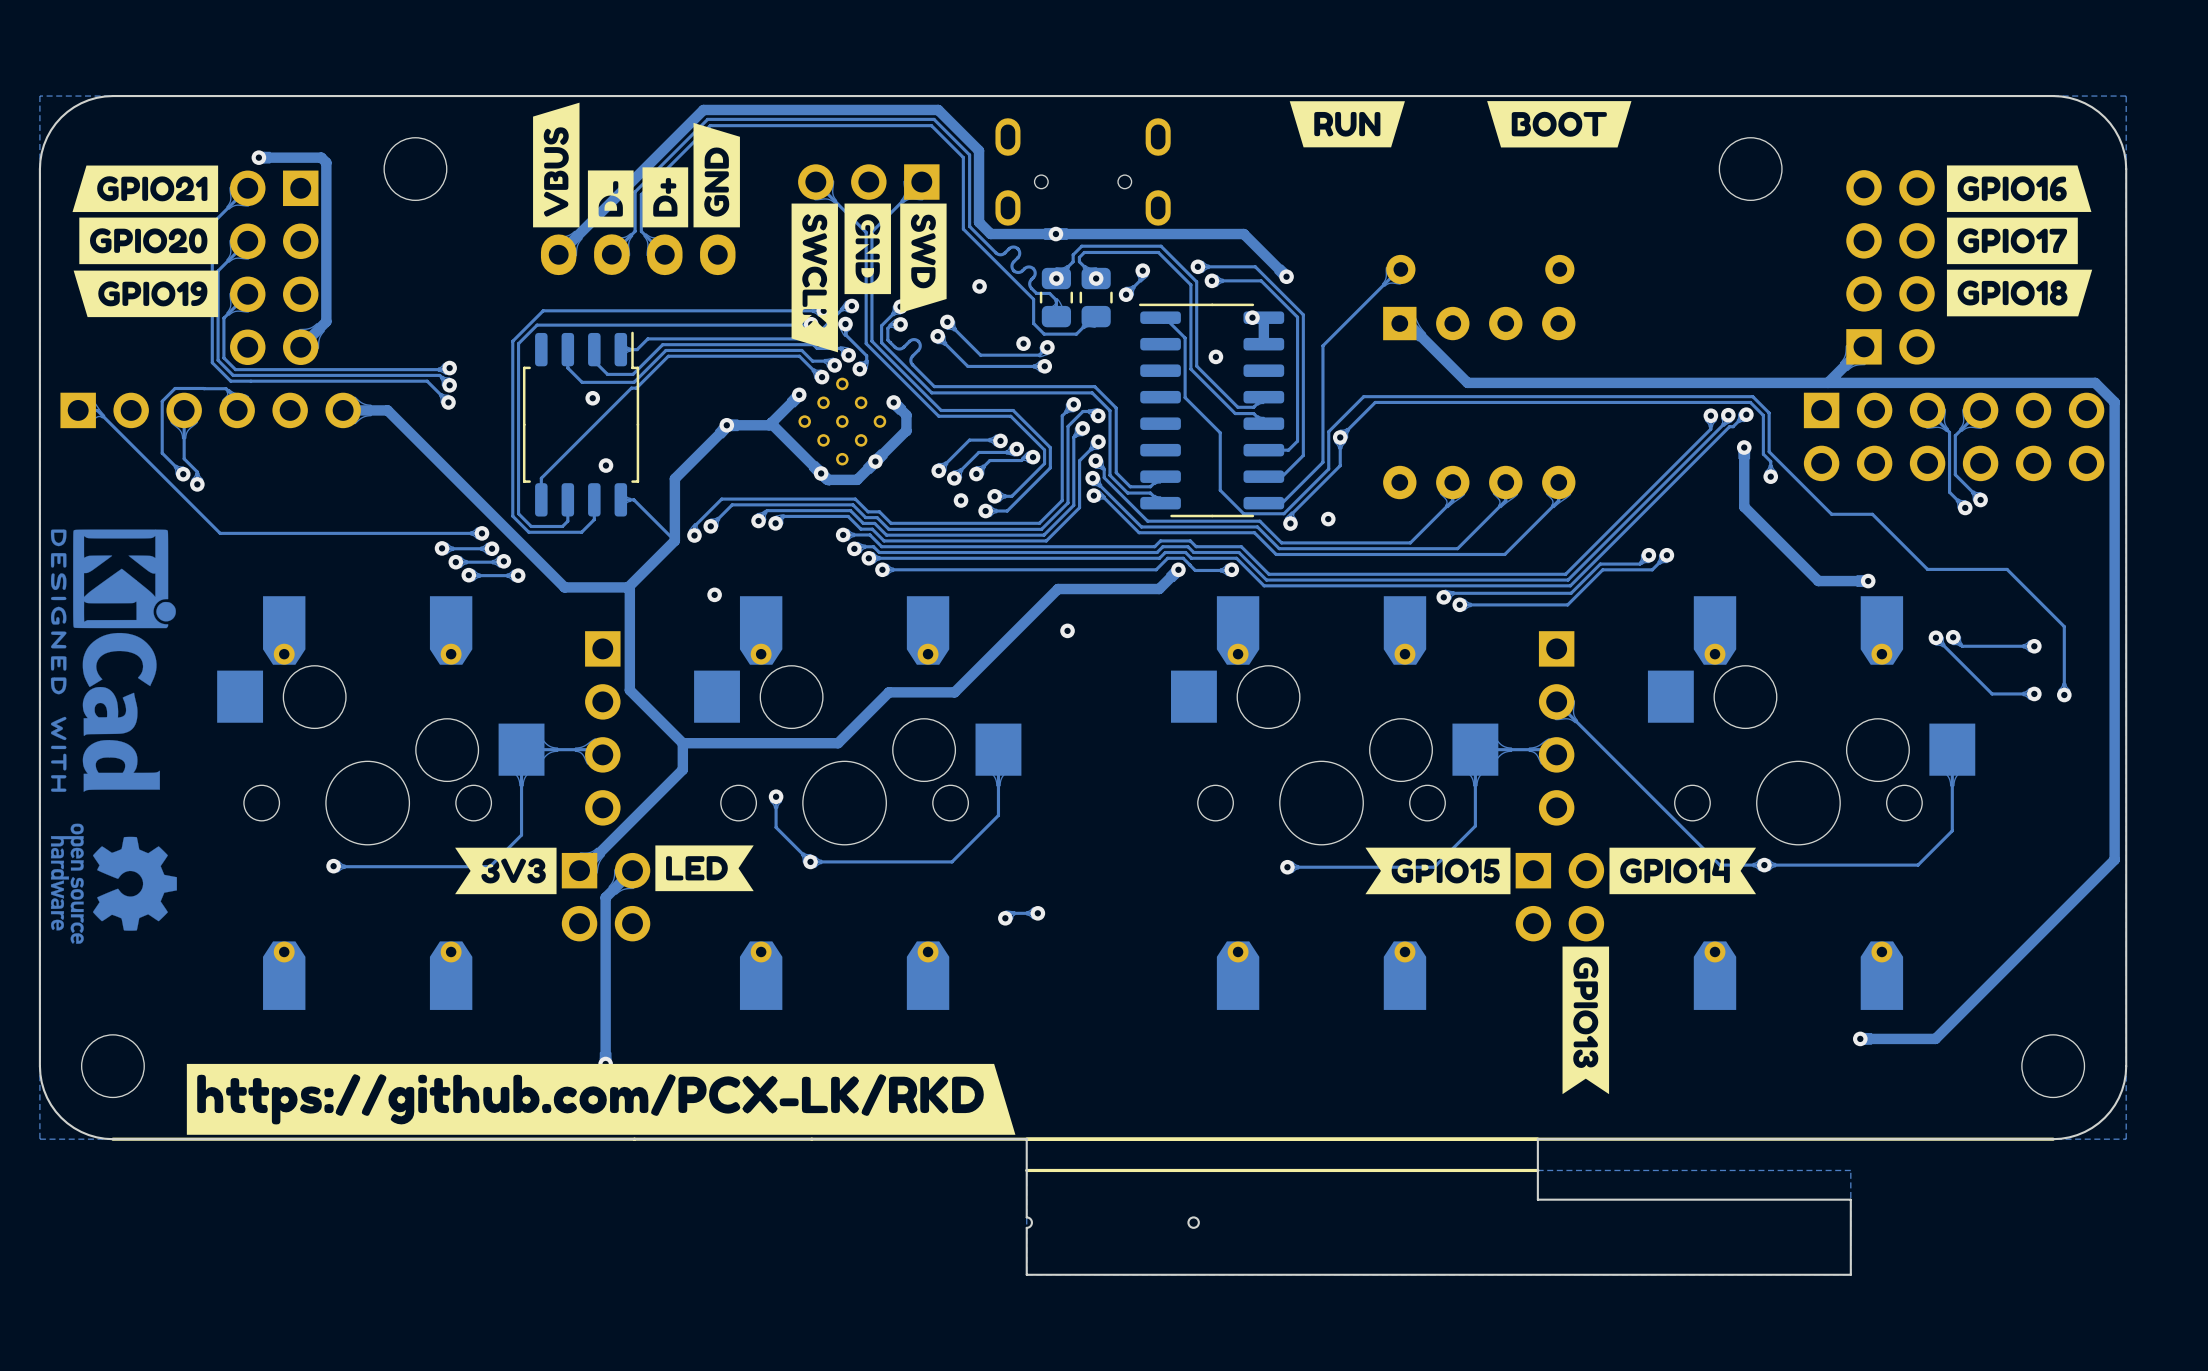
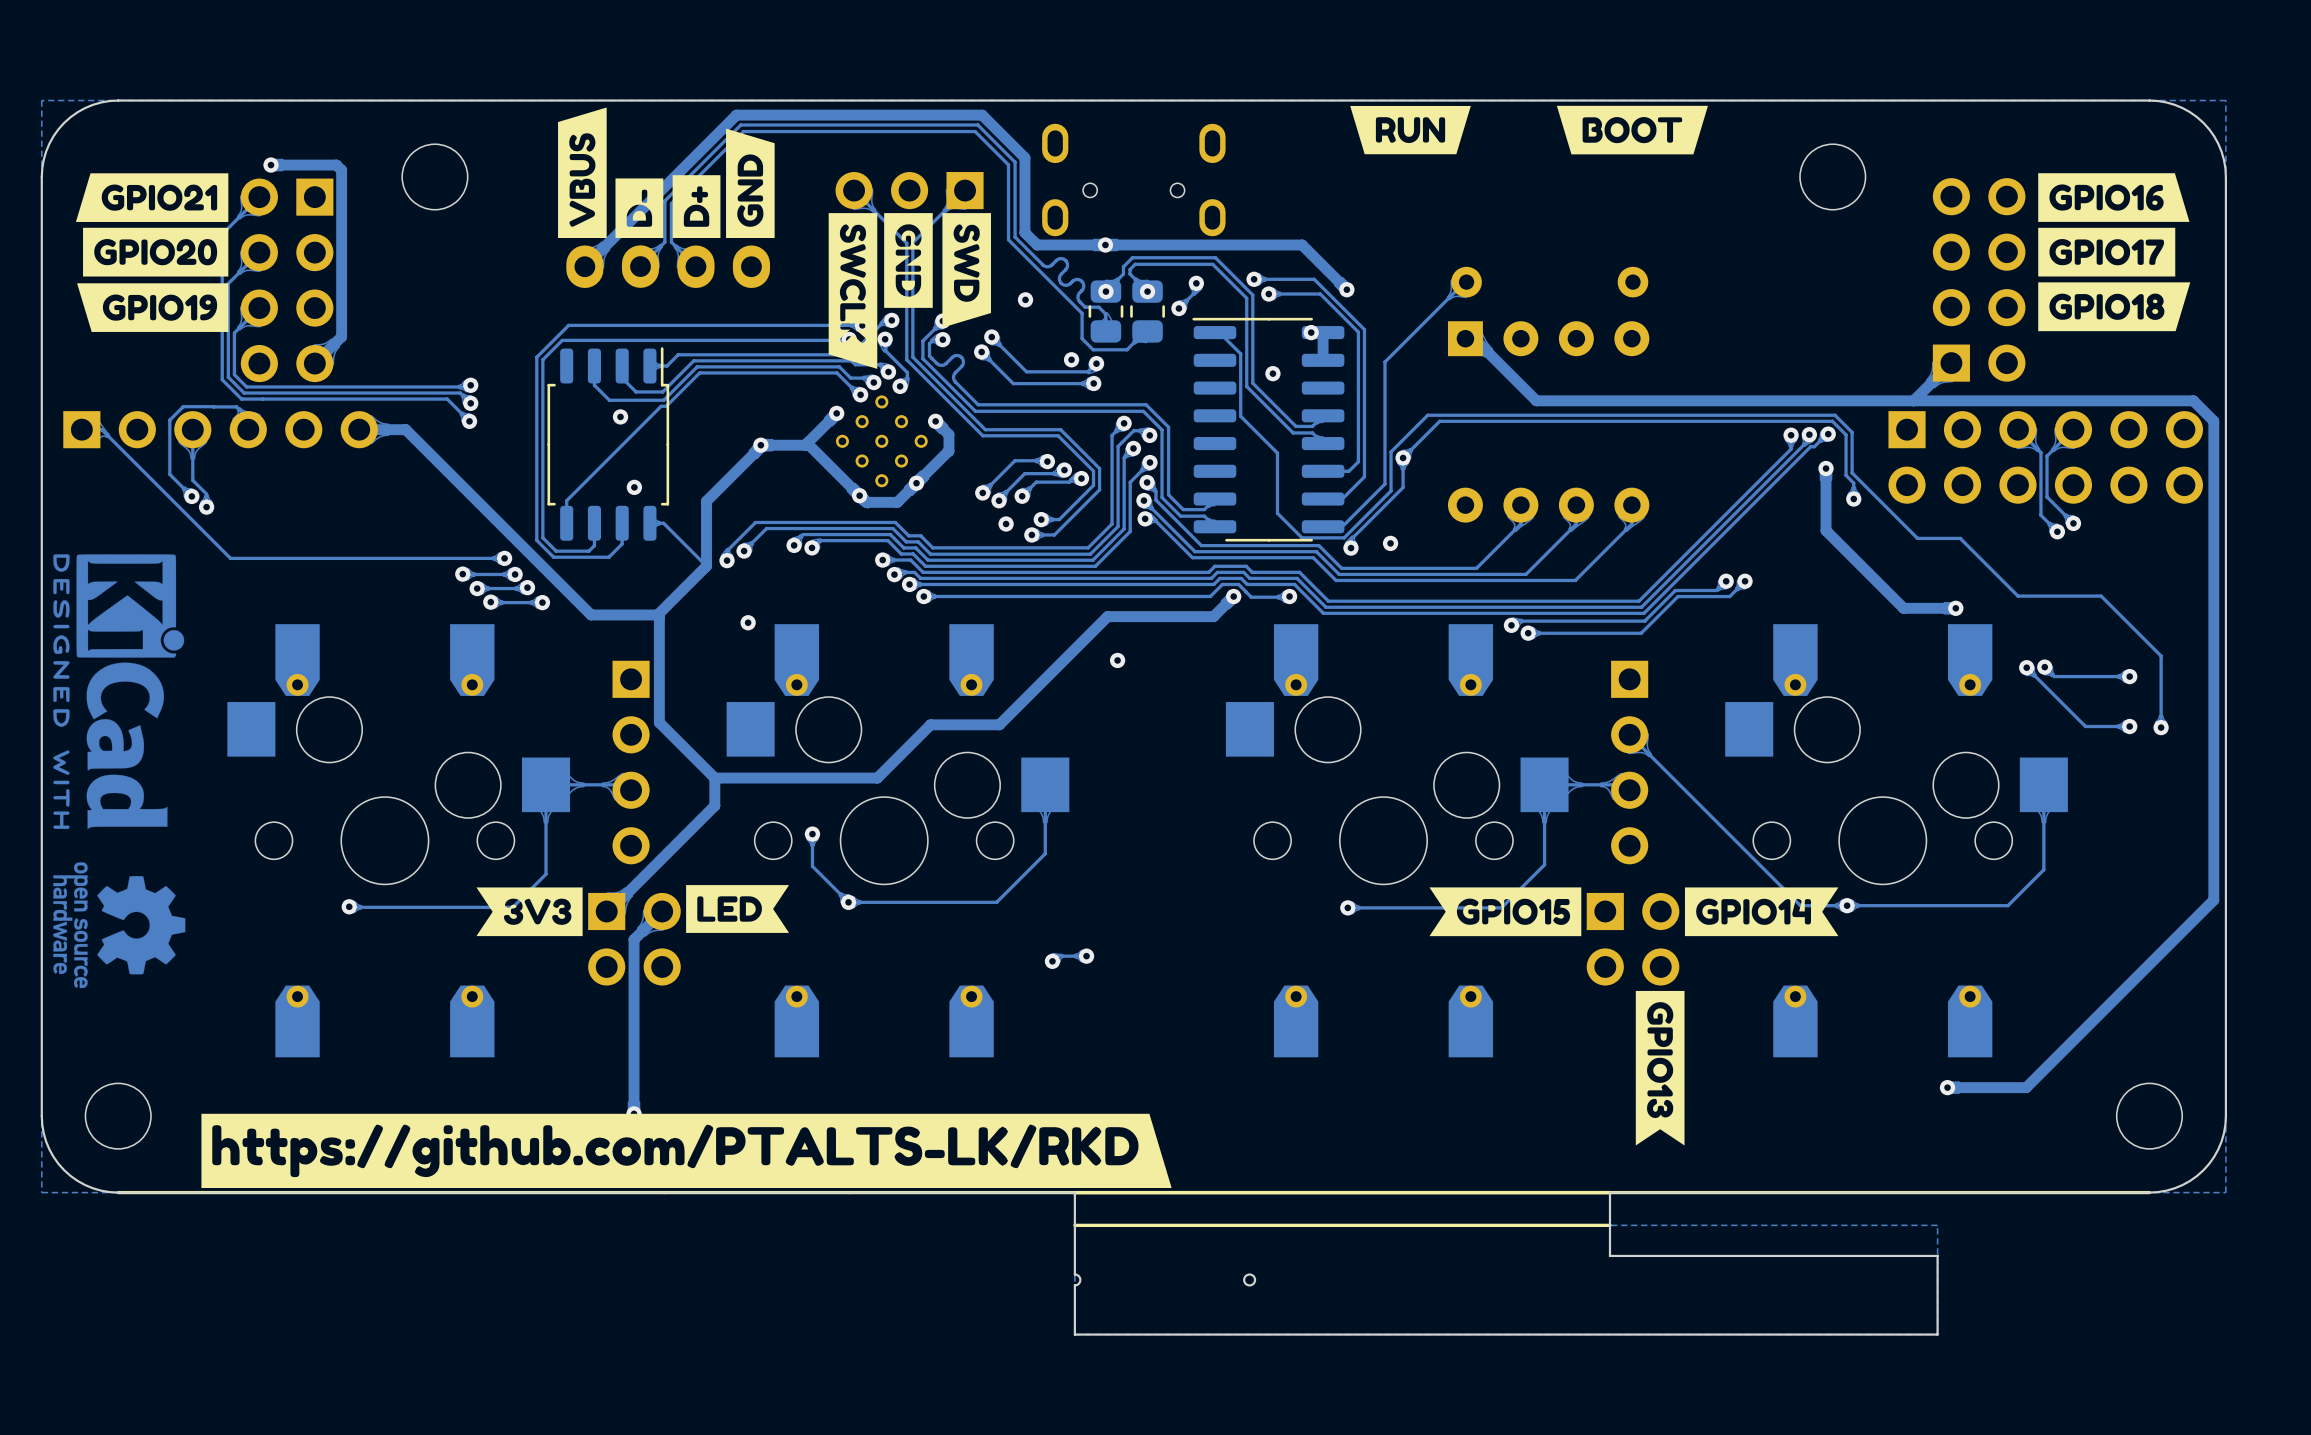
drawing: [186, 1063, 1016, 1135] -> none
drawing: none -> [201, 1113, 1172, 1189]

